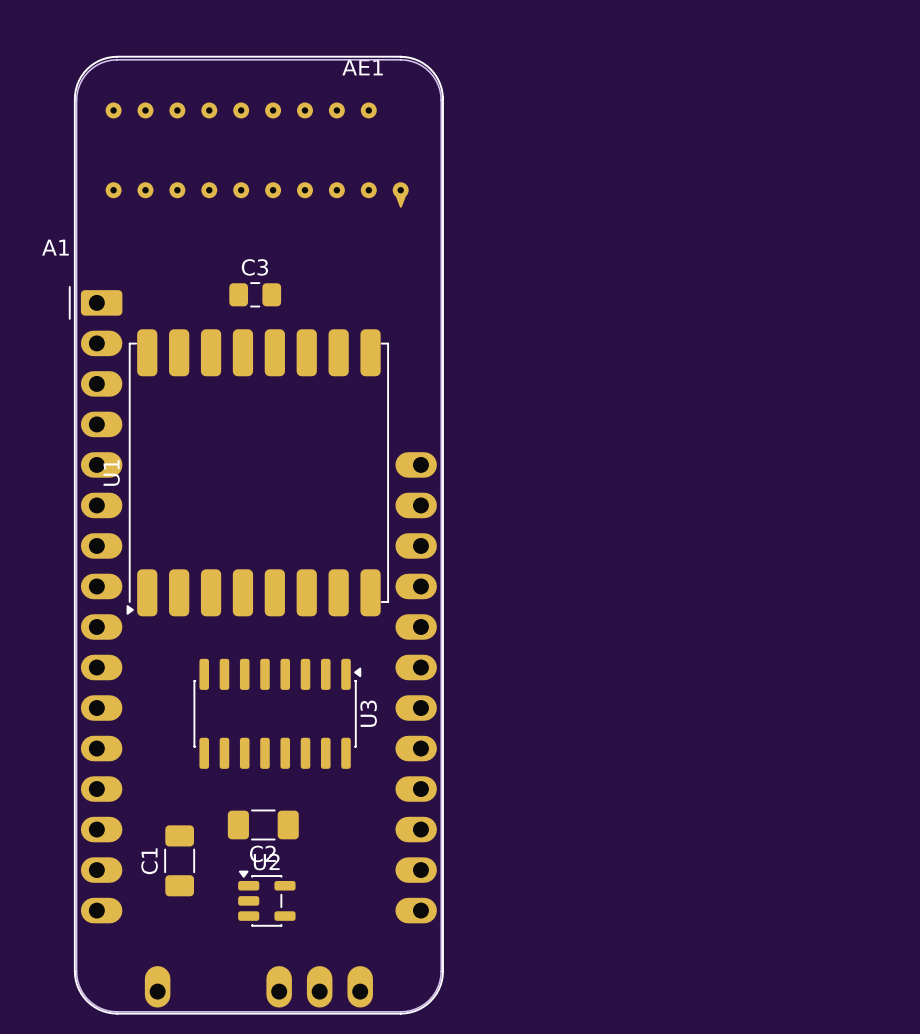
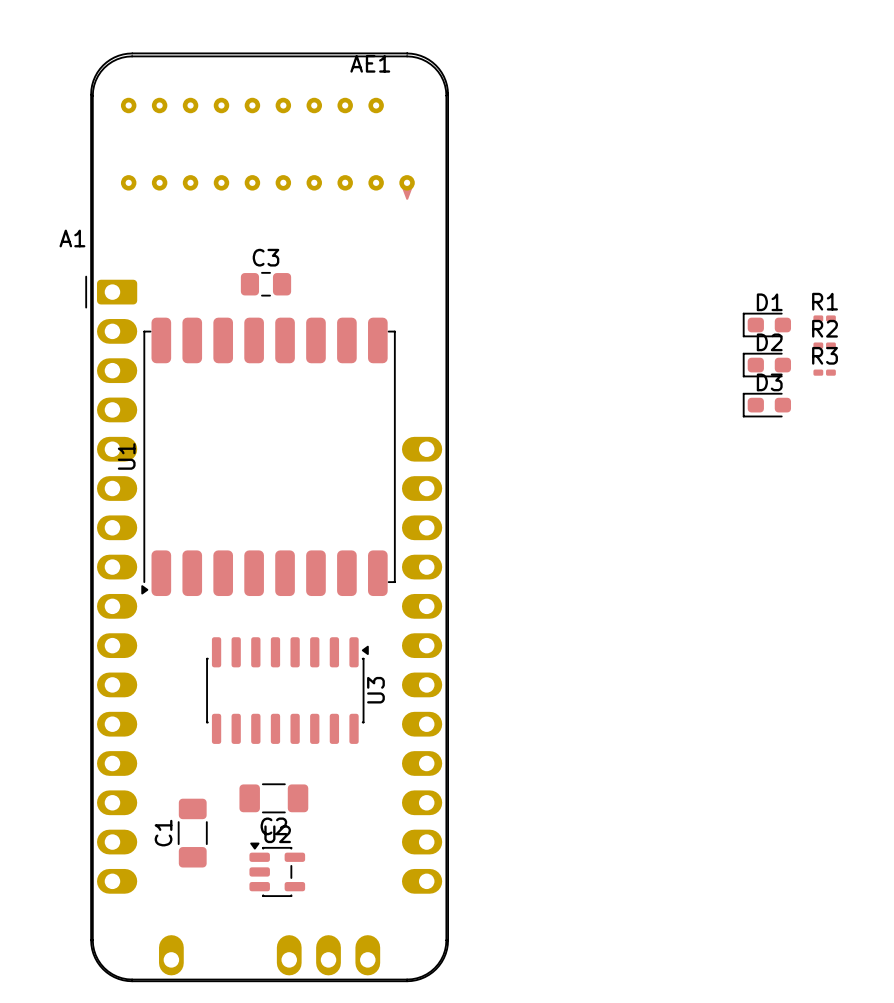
R1: none -> (824, 318)
D1: none -> (766, 324)
R2: none -> (824, 345)
D2: none -> (766, 365)
R3: none -> (824, 372)
D3: none -> (766, 405)

